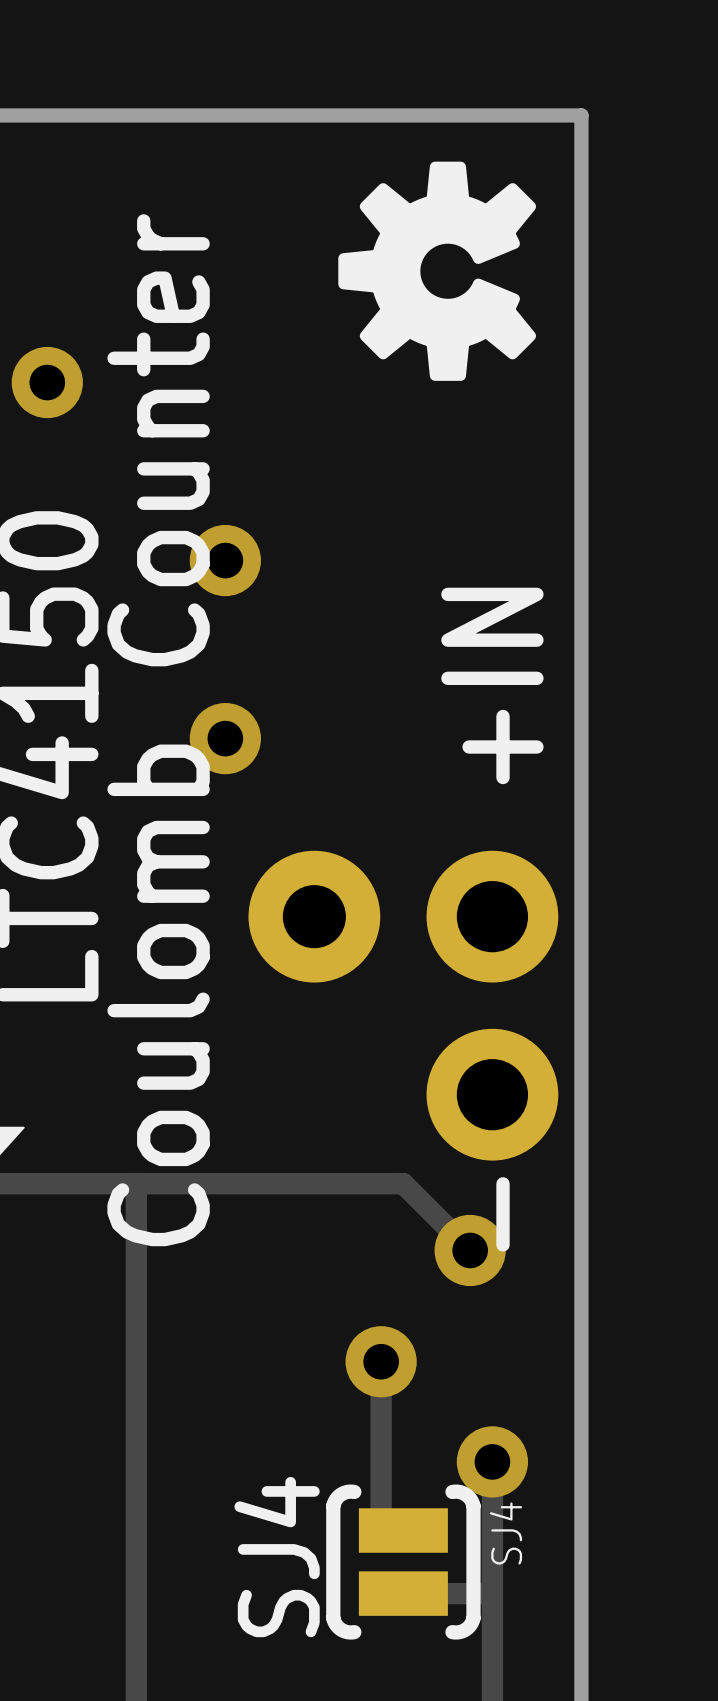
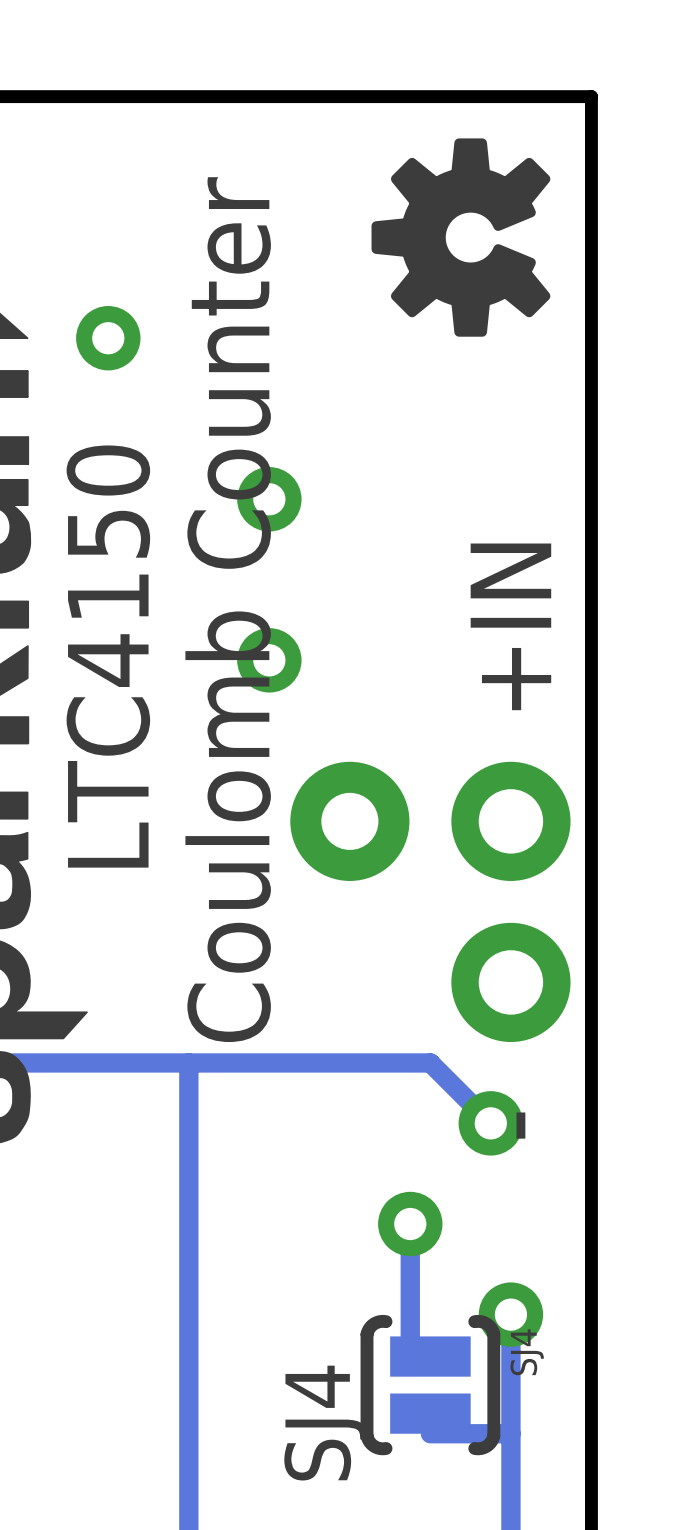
text position: Coulomb Counter (158, 730) -> Coulomb Counter (228, 609)
SJ4 position: (403, 1562) -> (430, 1385)

